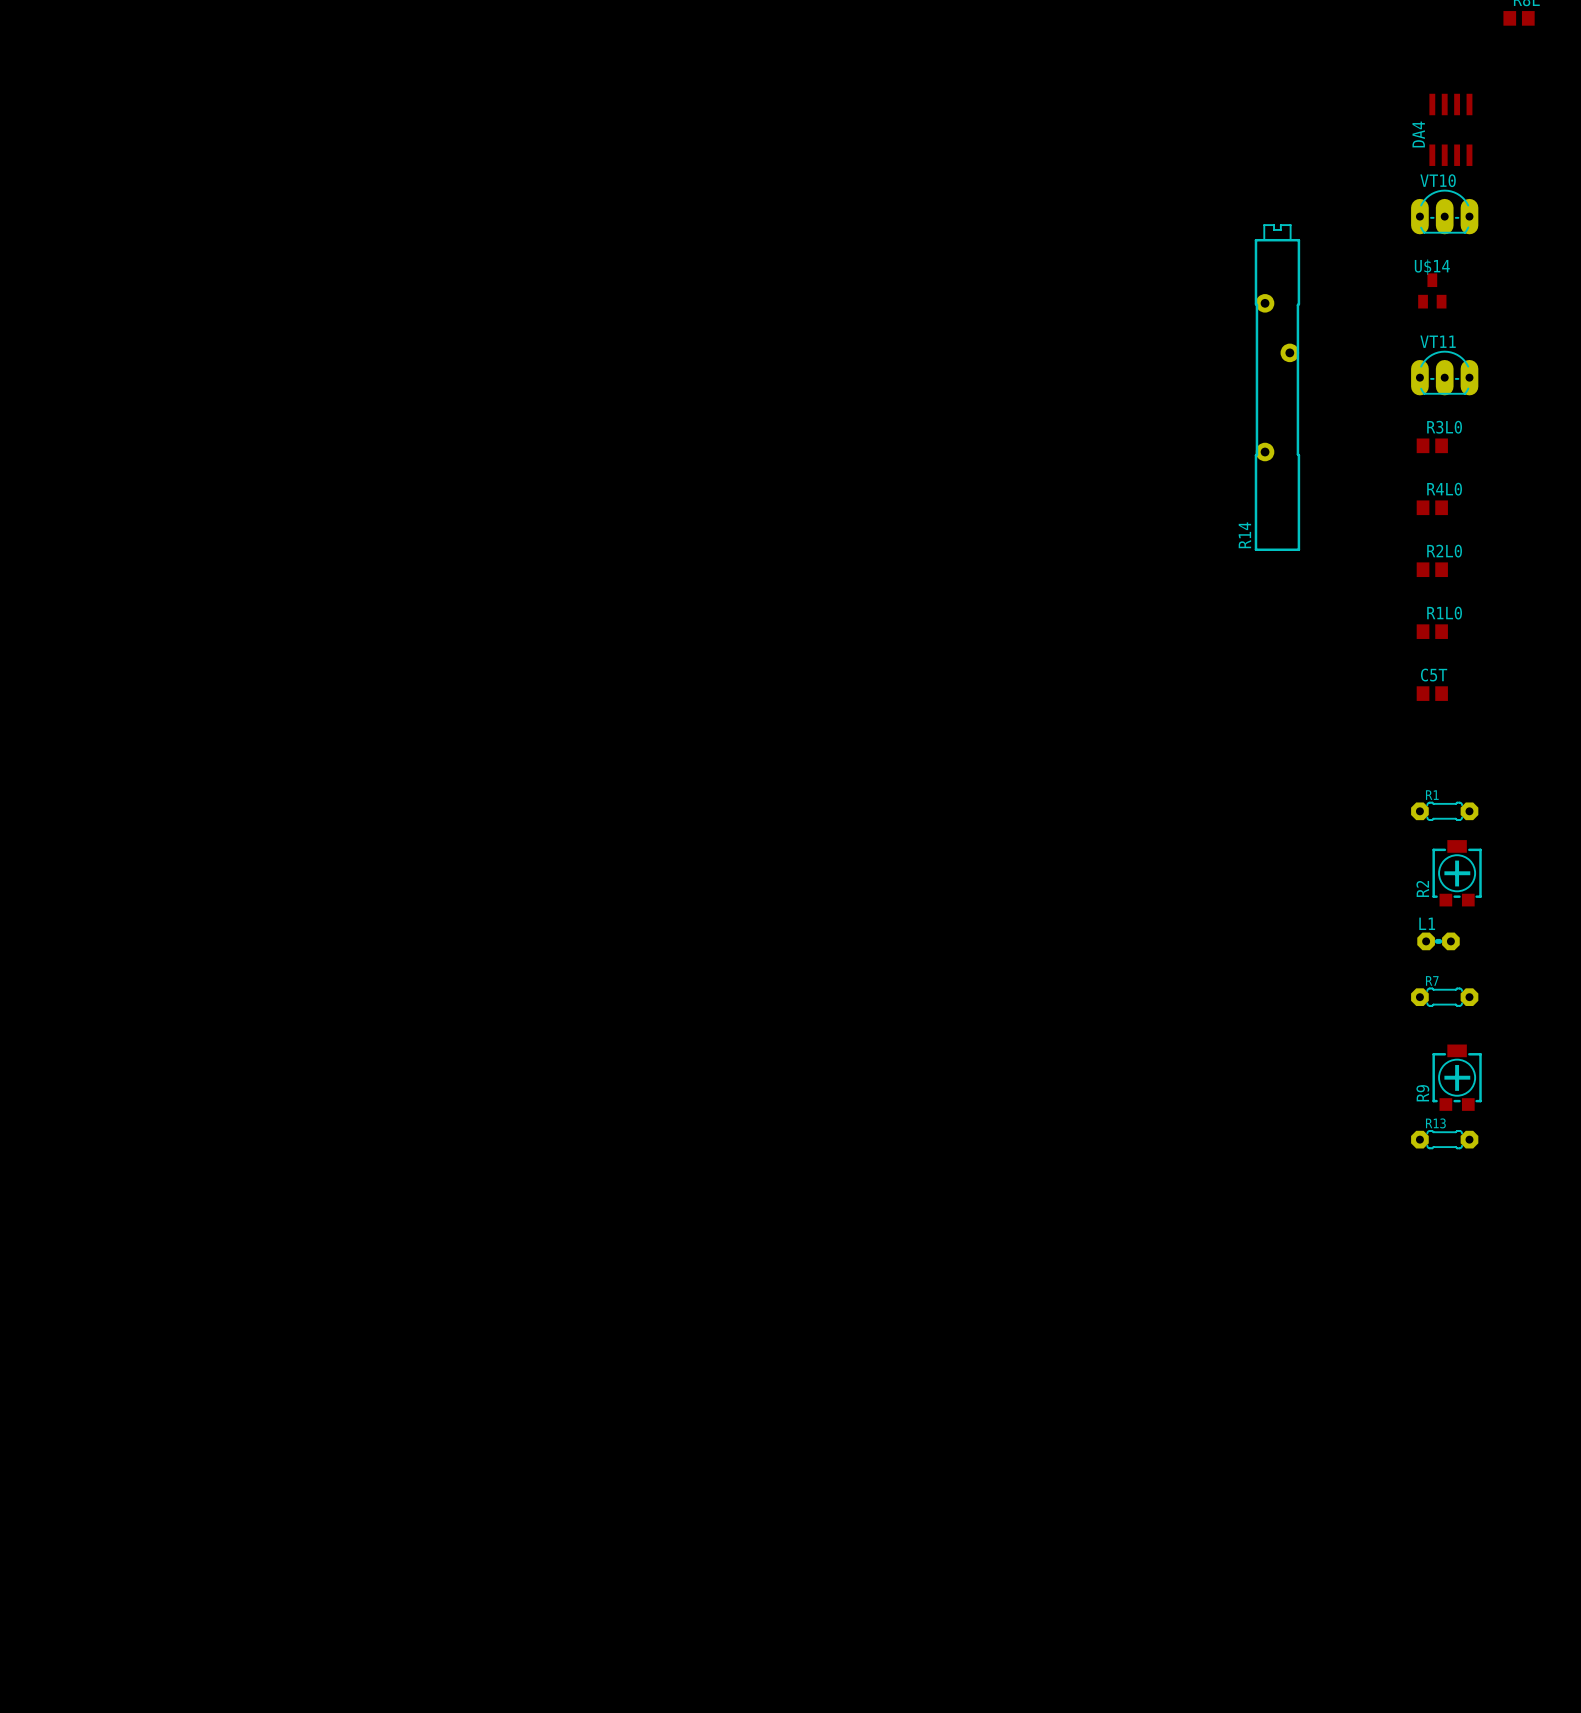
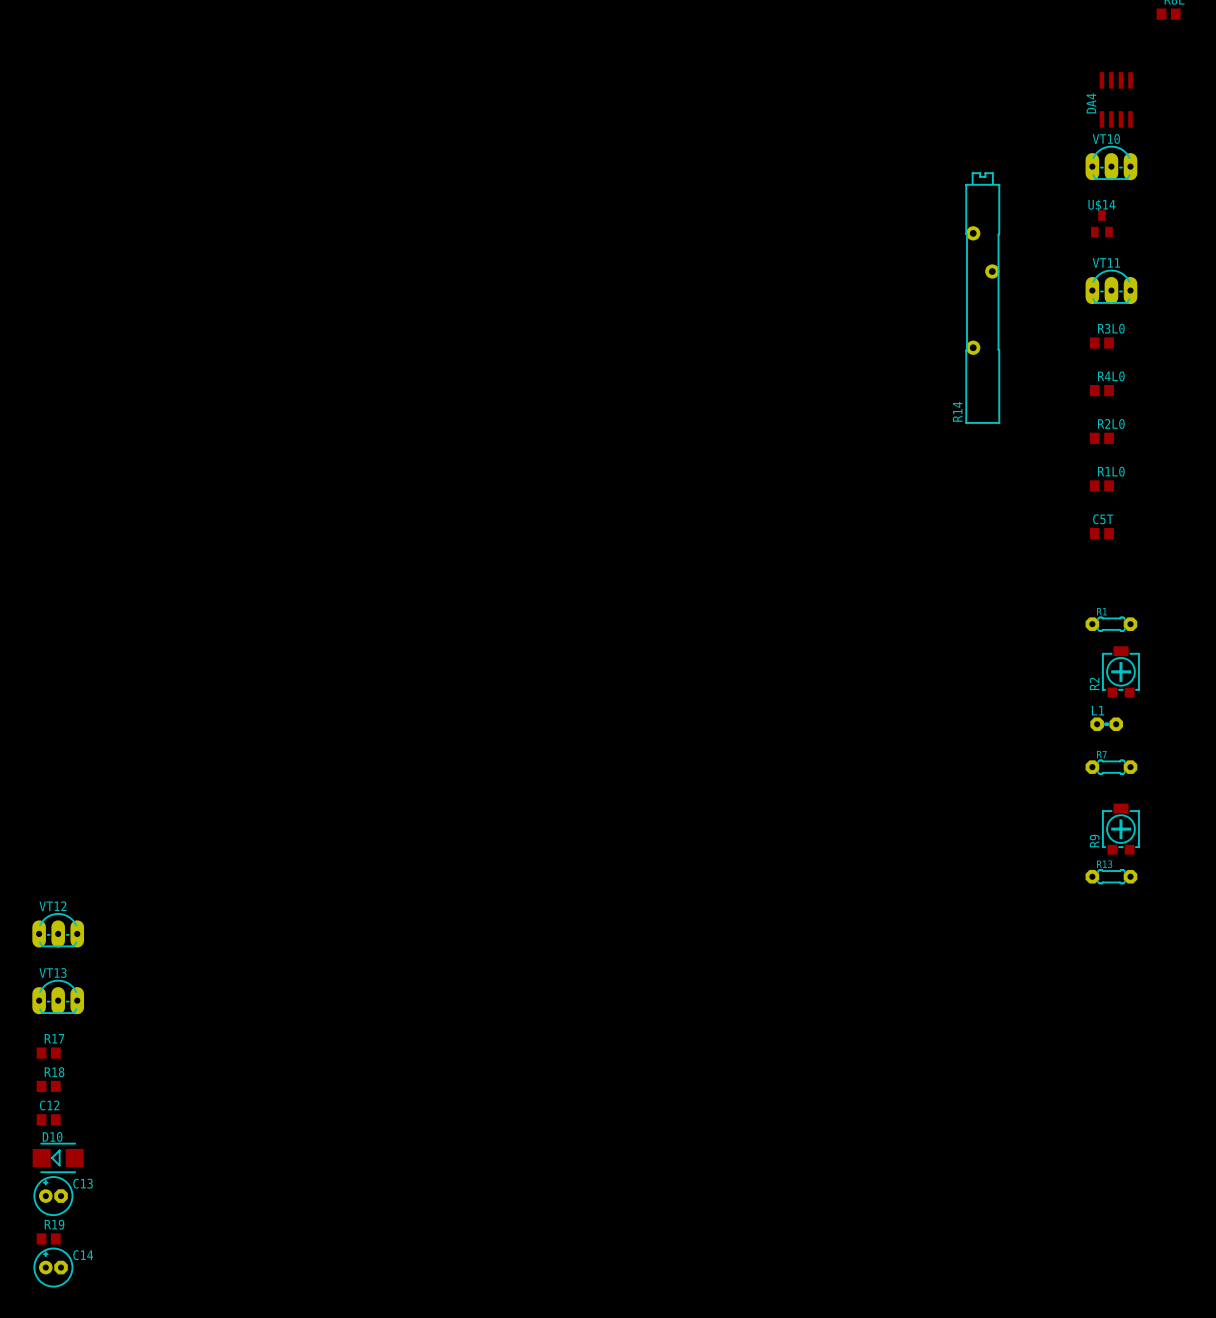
VT12: none -> (58, 930)
VT13: none -> (58, 997)
R17: none -> (48, 1053)
R18: none -> (48, 1086)
C12: none -> (48, 1119)
D10: none -> (58, 1157)
C13: none -> (53, 1196)
R19: none -> (48, 1238)
C14: none -> (53, 1267)

